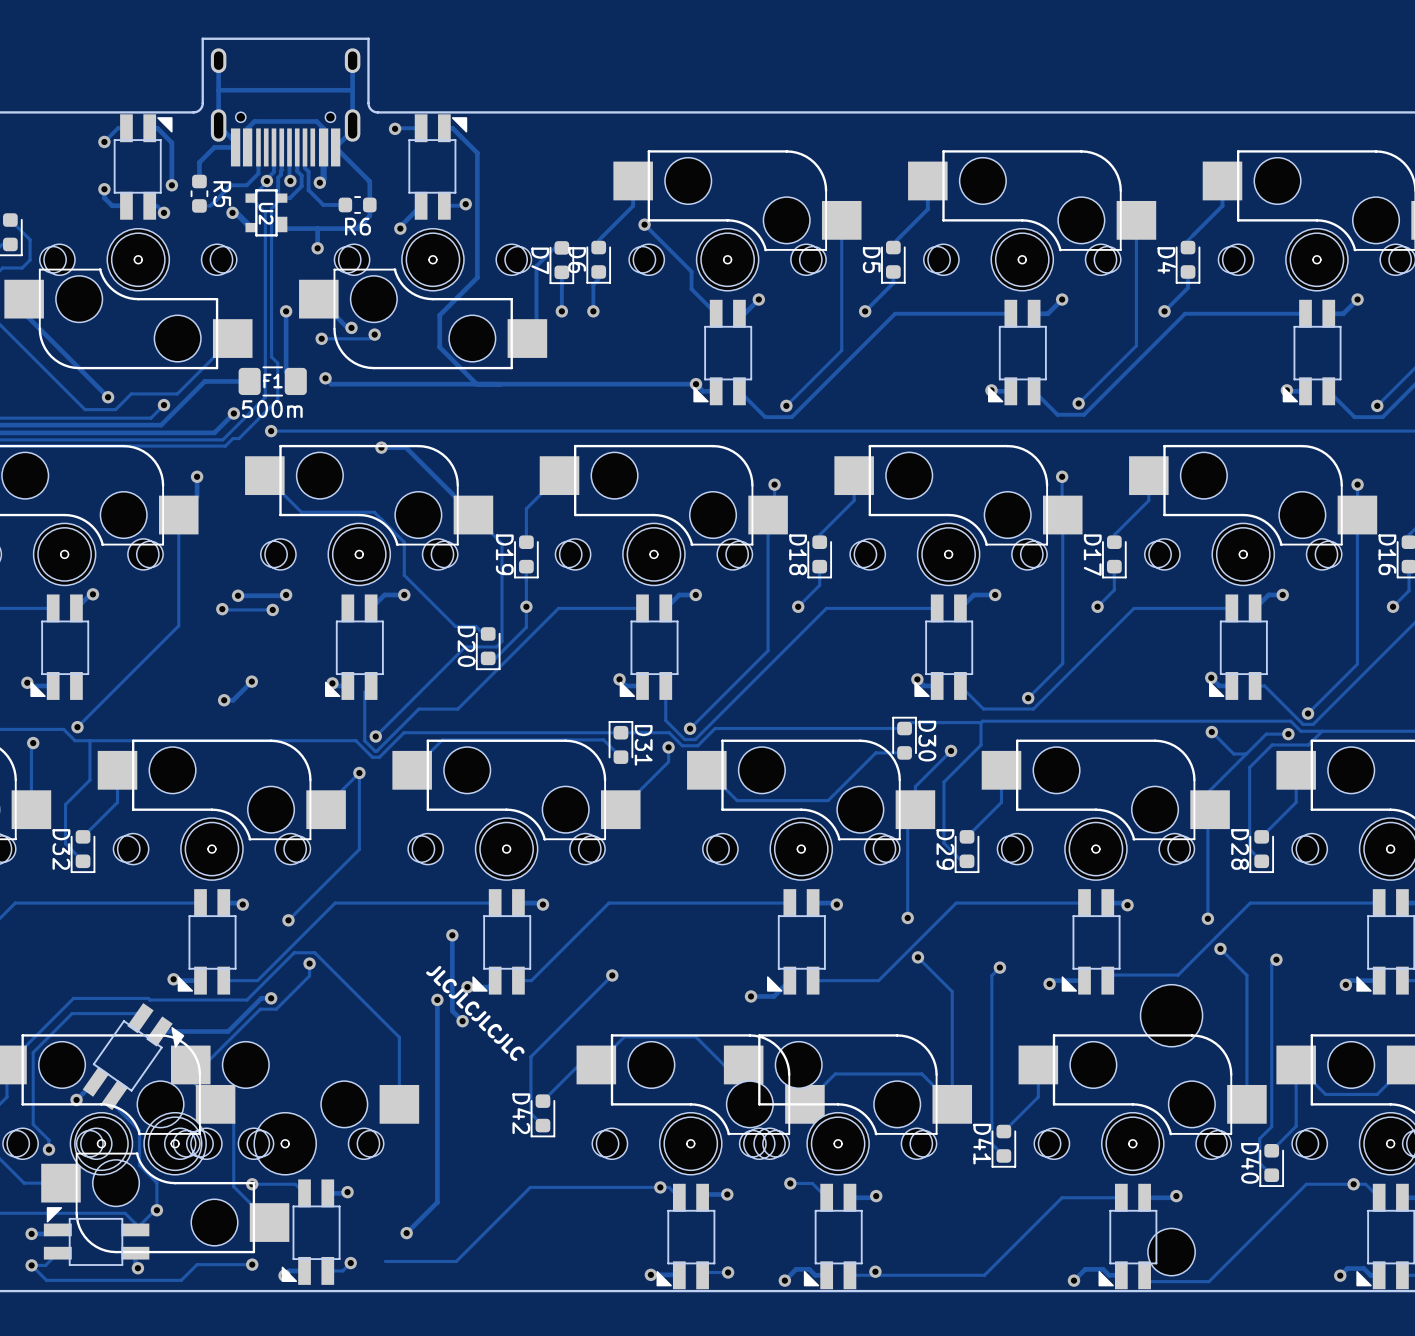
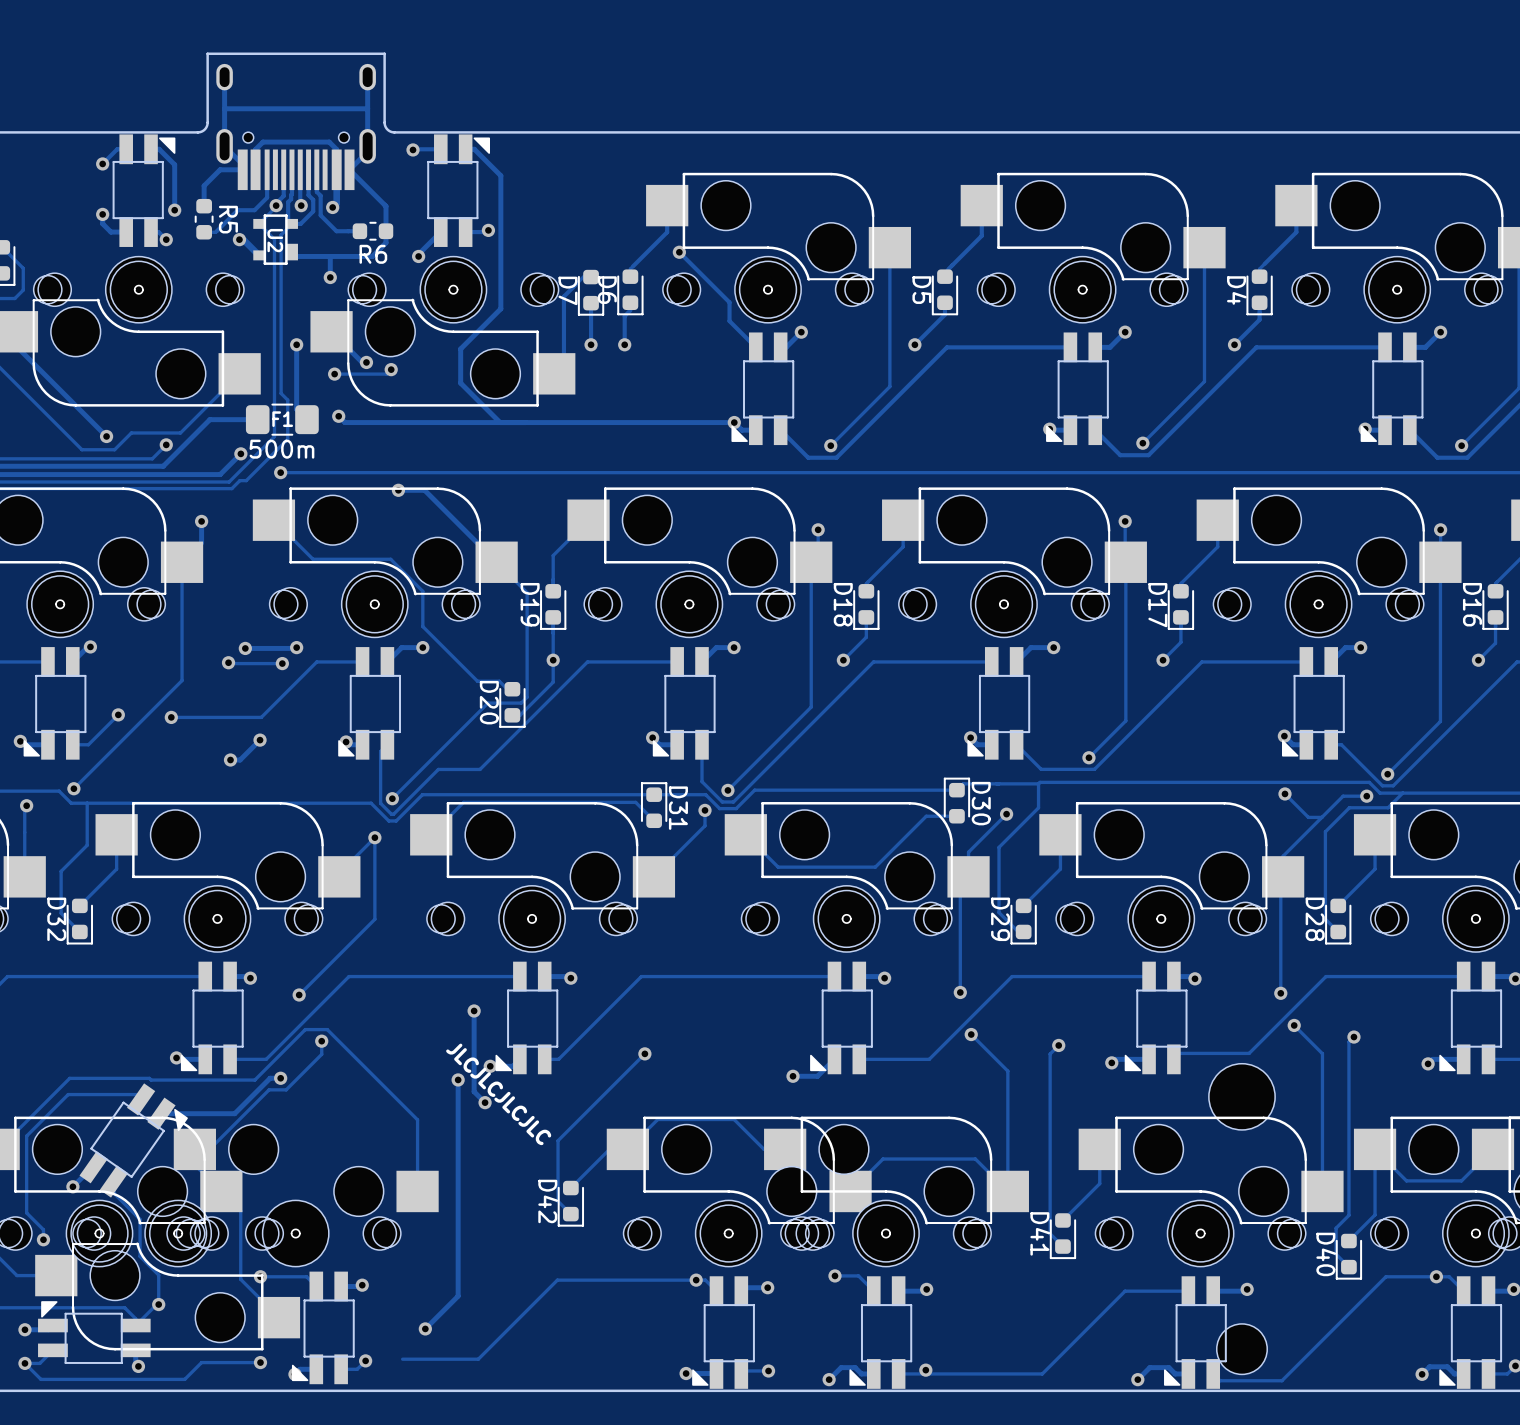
track: none -> (362, 661) (316, 661) (261, 717) (171, 717)
track: none -> (118, 714) (88, 744) (72, 744)
via: none -> (118, 714)
via: none -> (171, 717)

